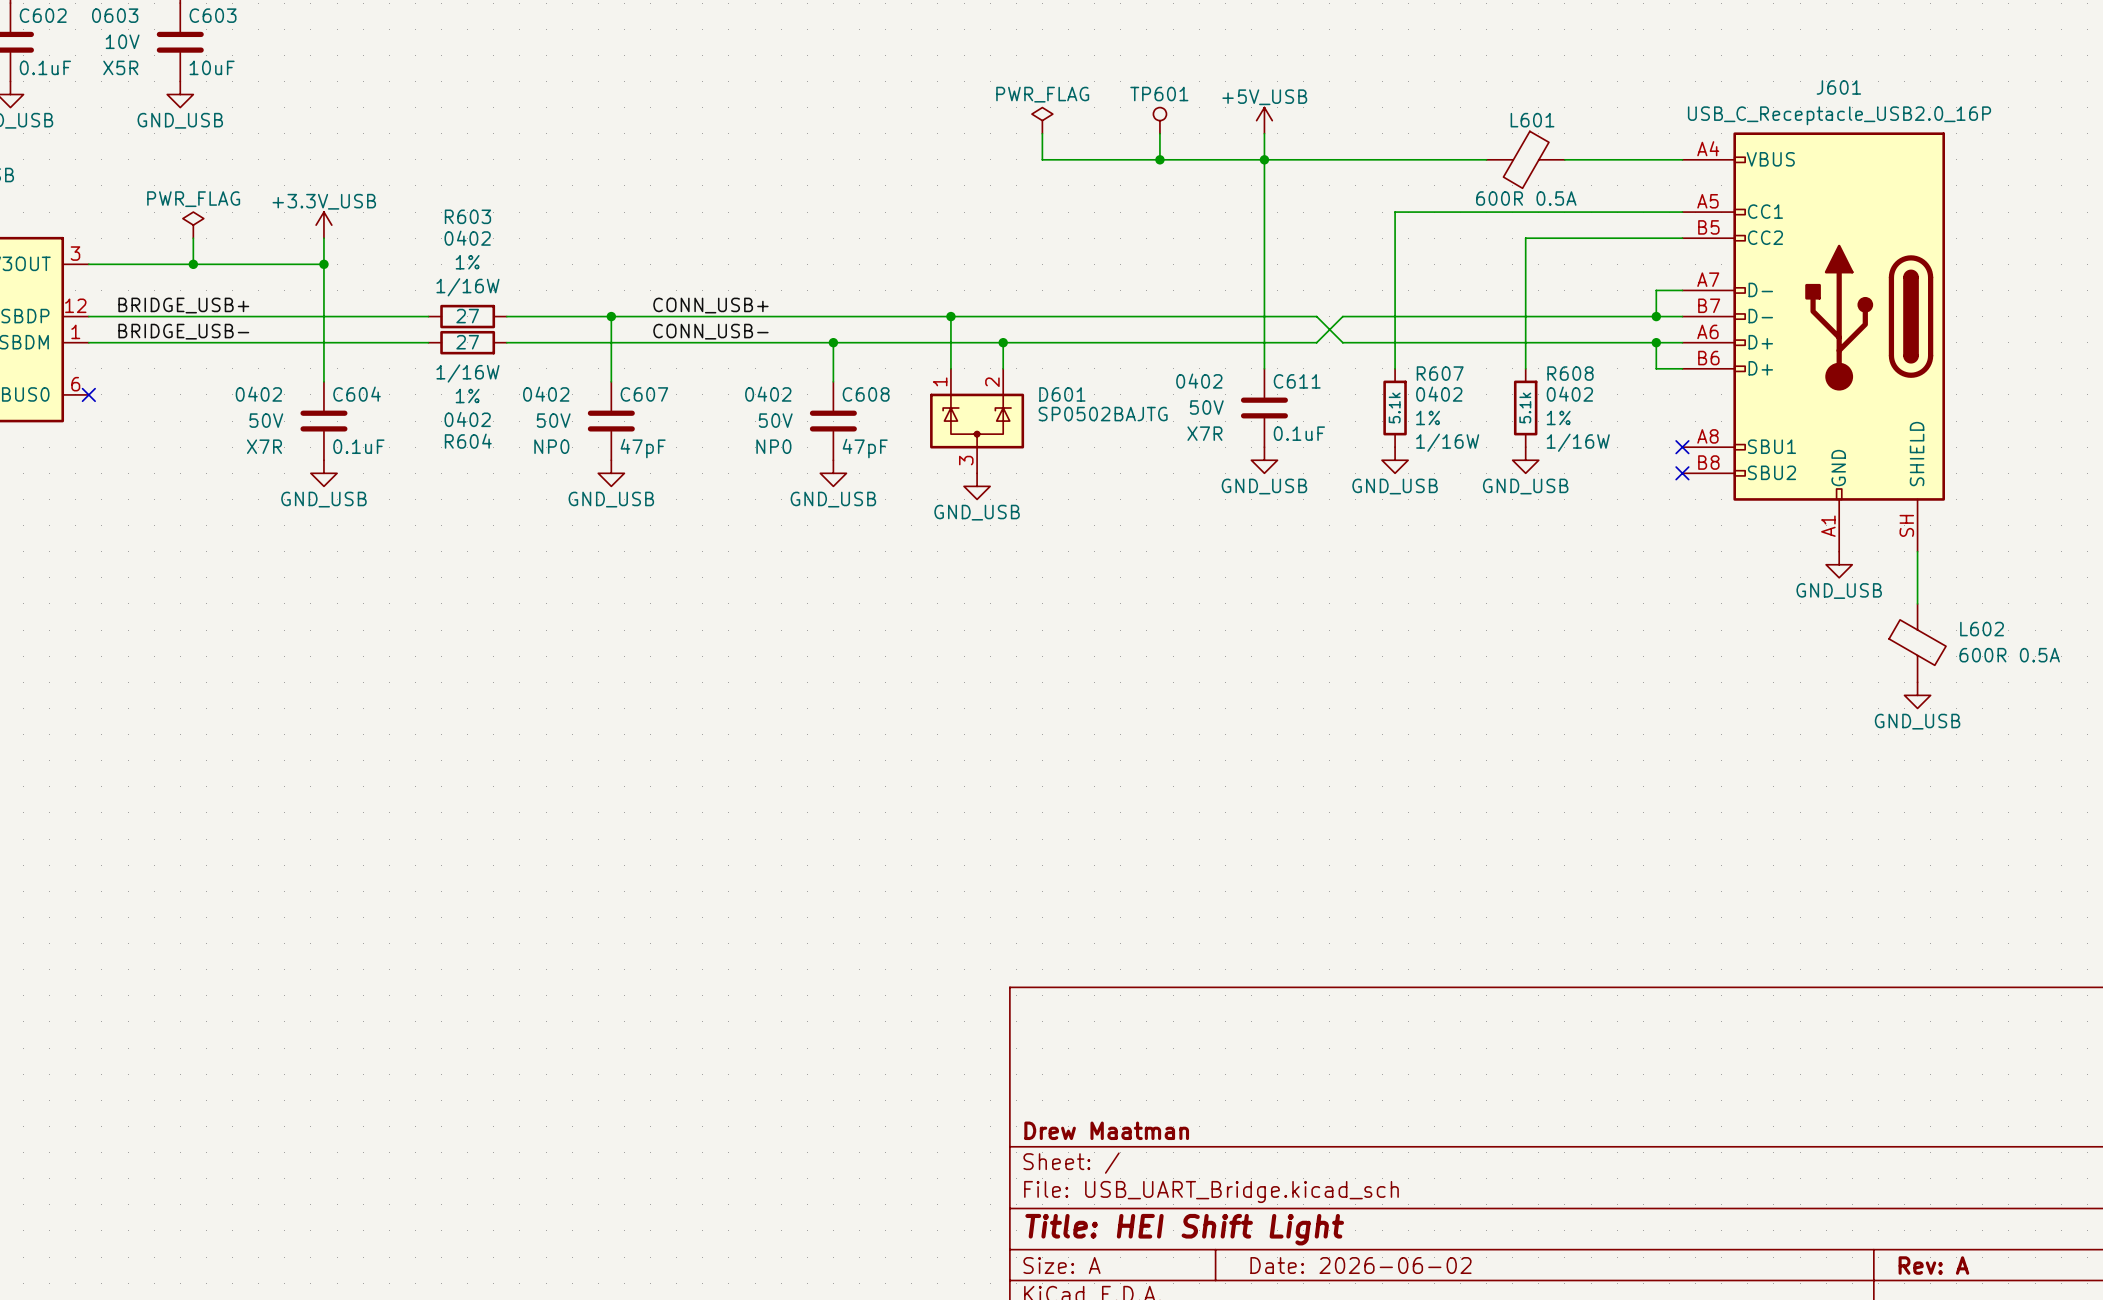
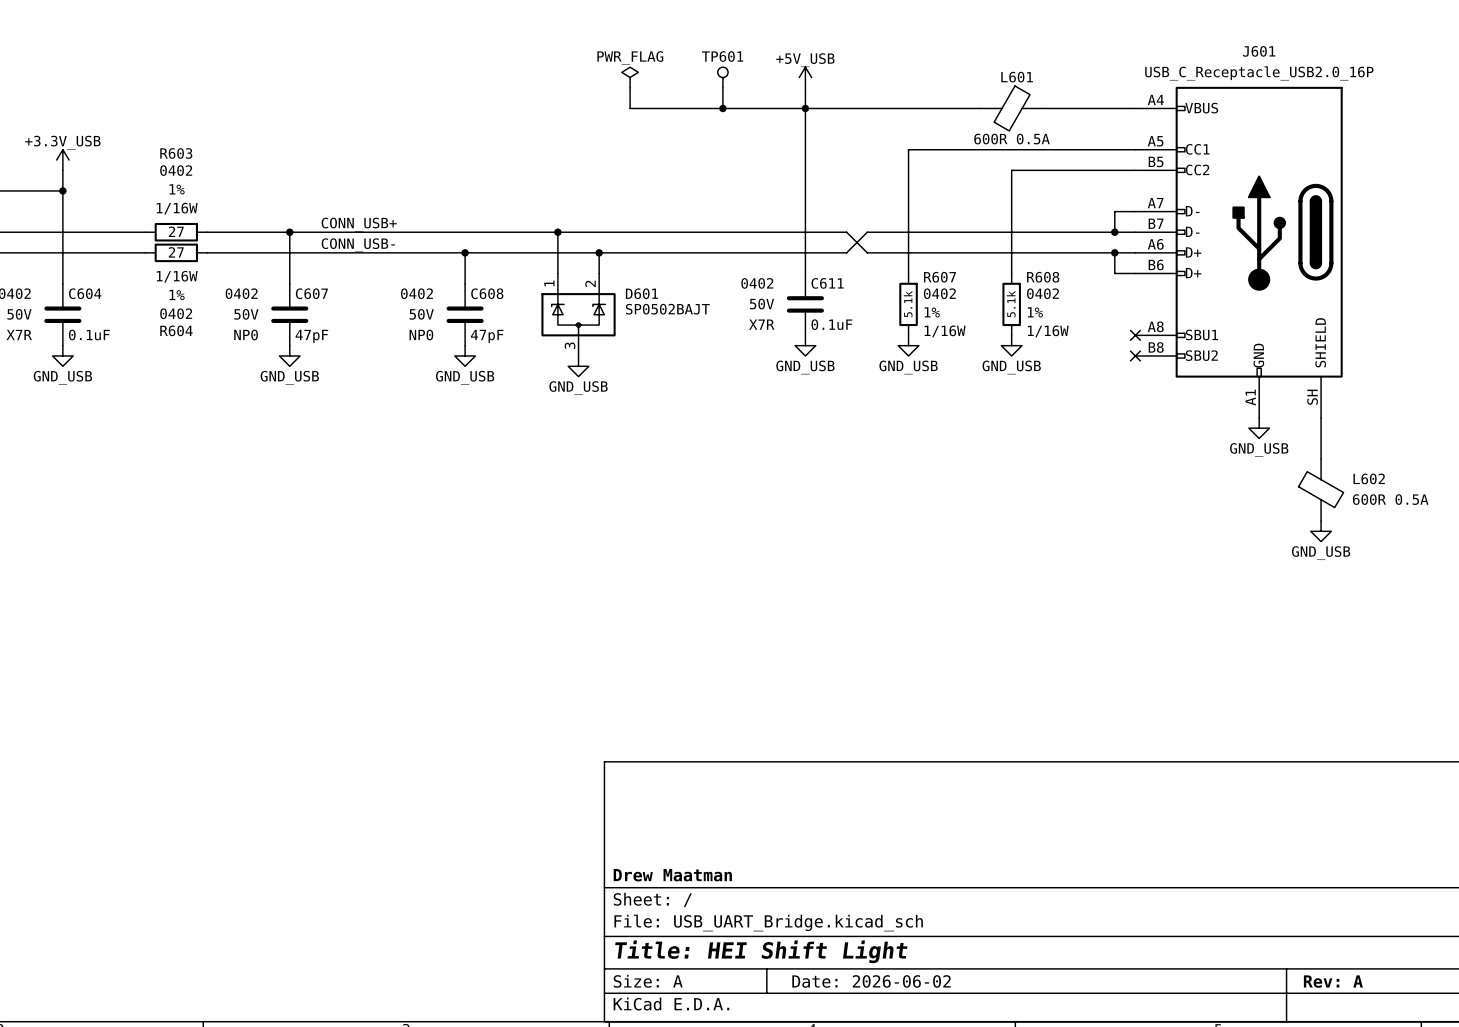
D601 value: SP0502BAJTG (1103, 414) -> SP0502BAJT (667, 309)

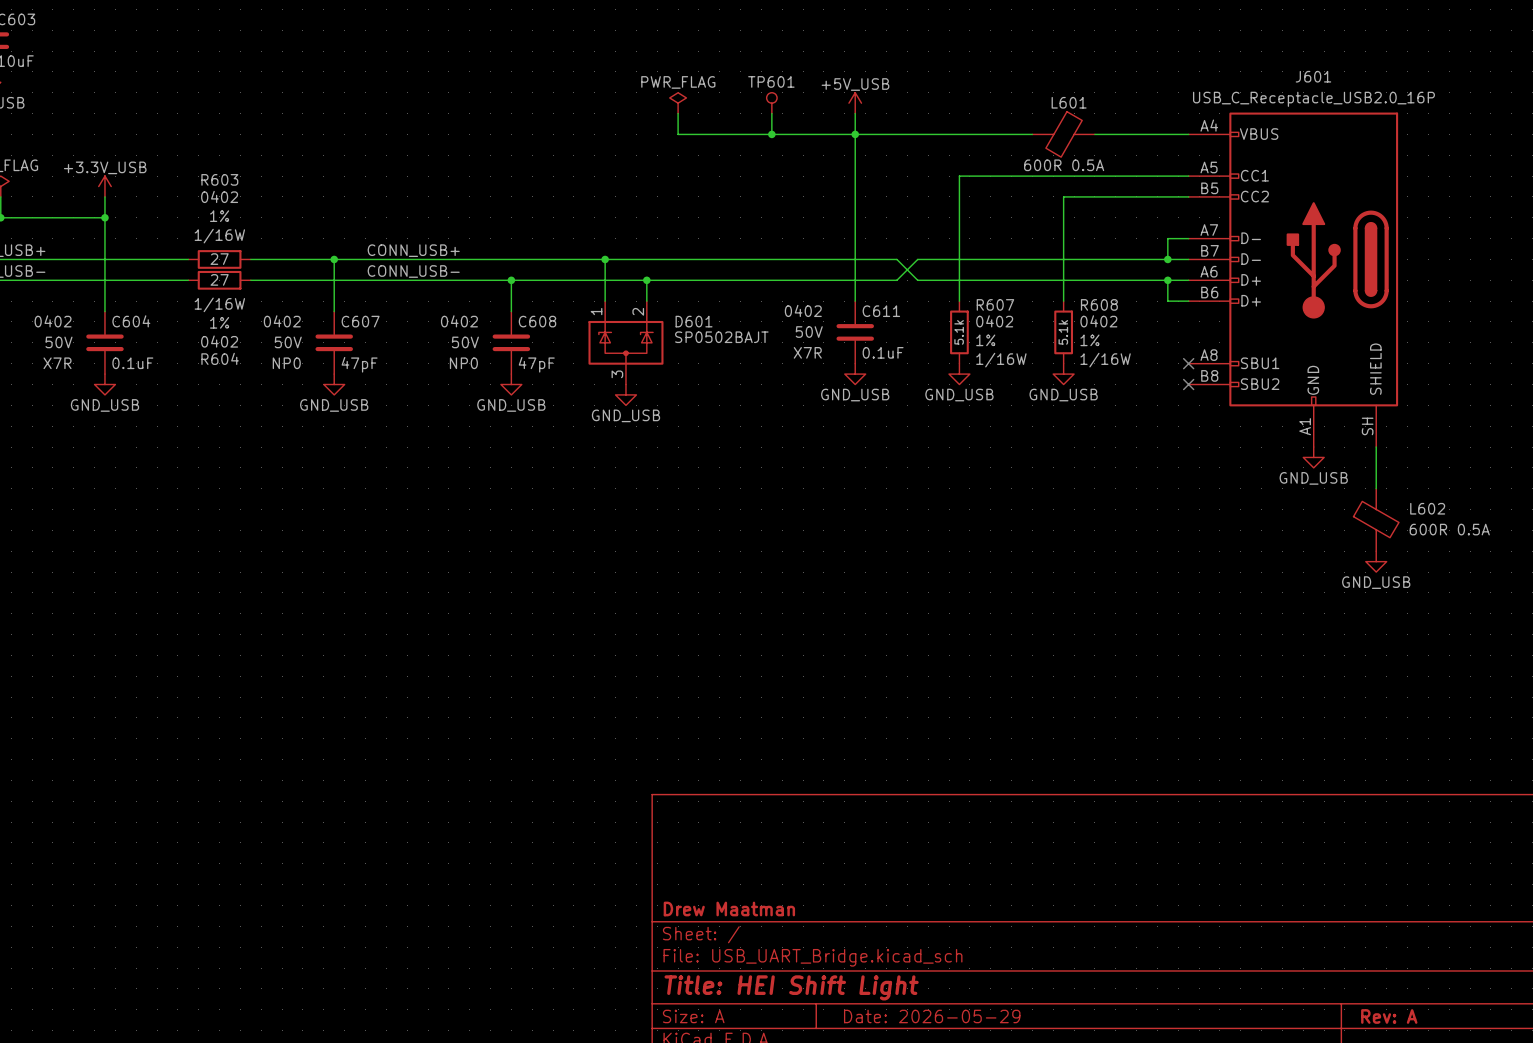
title block: Date: 2026-06-02 (871, 981) -> Date: 2026-05-29 (932, 1016)

